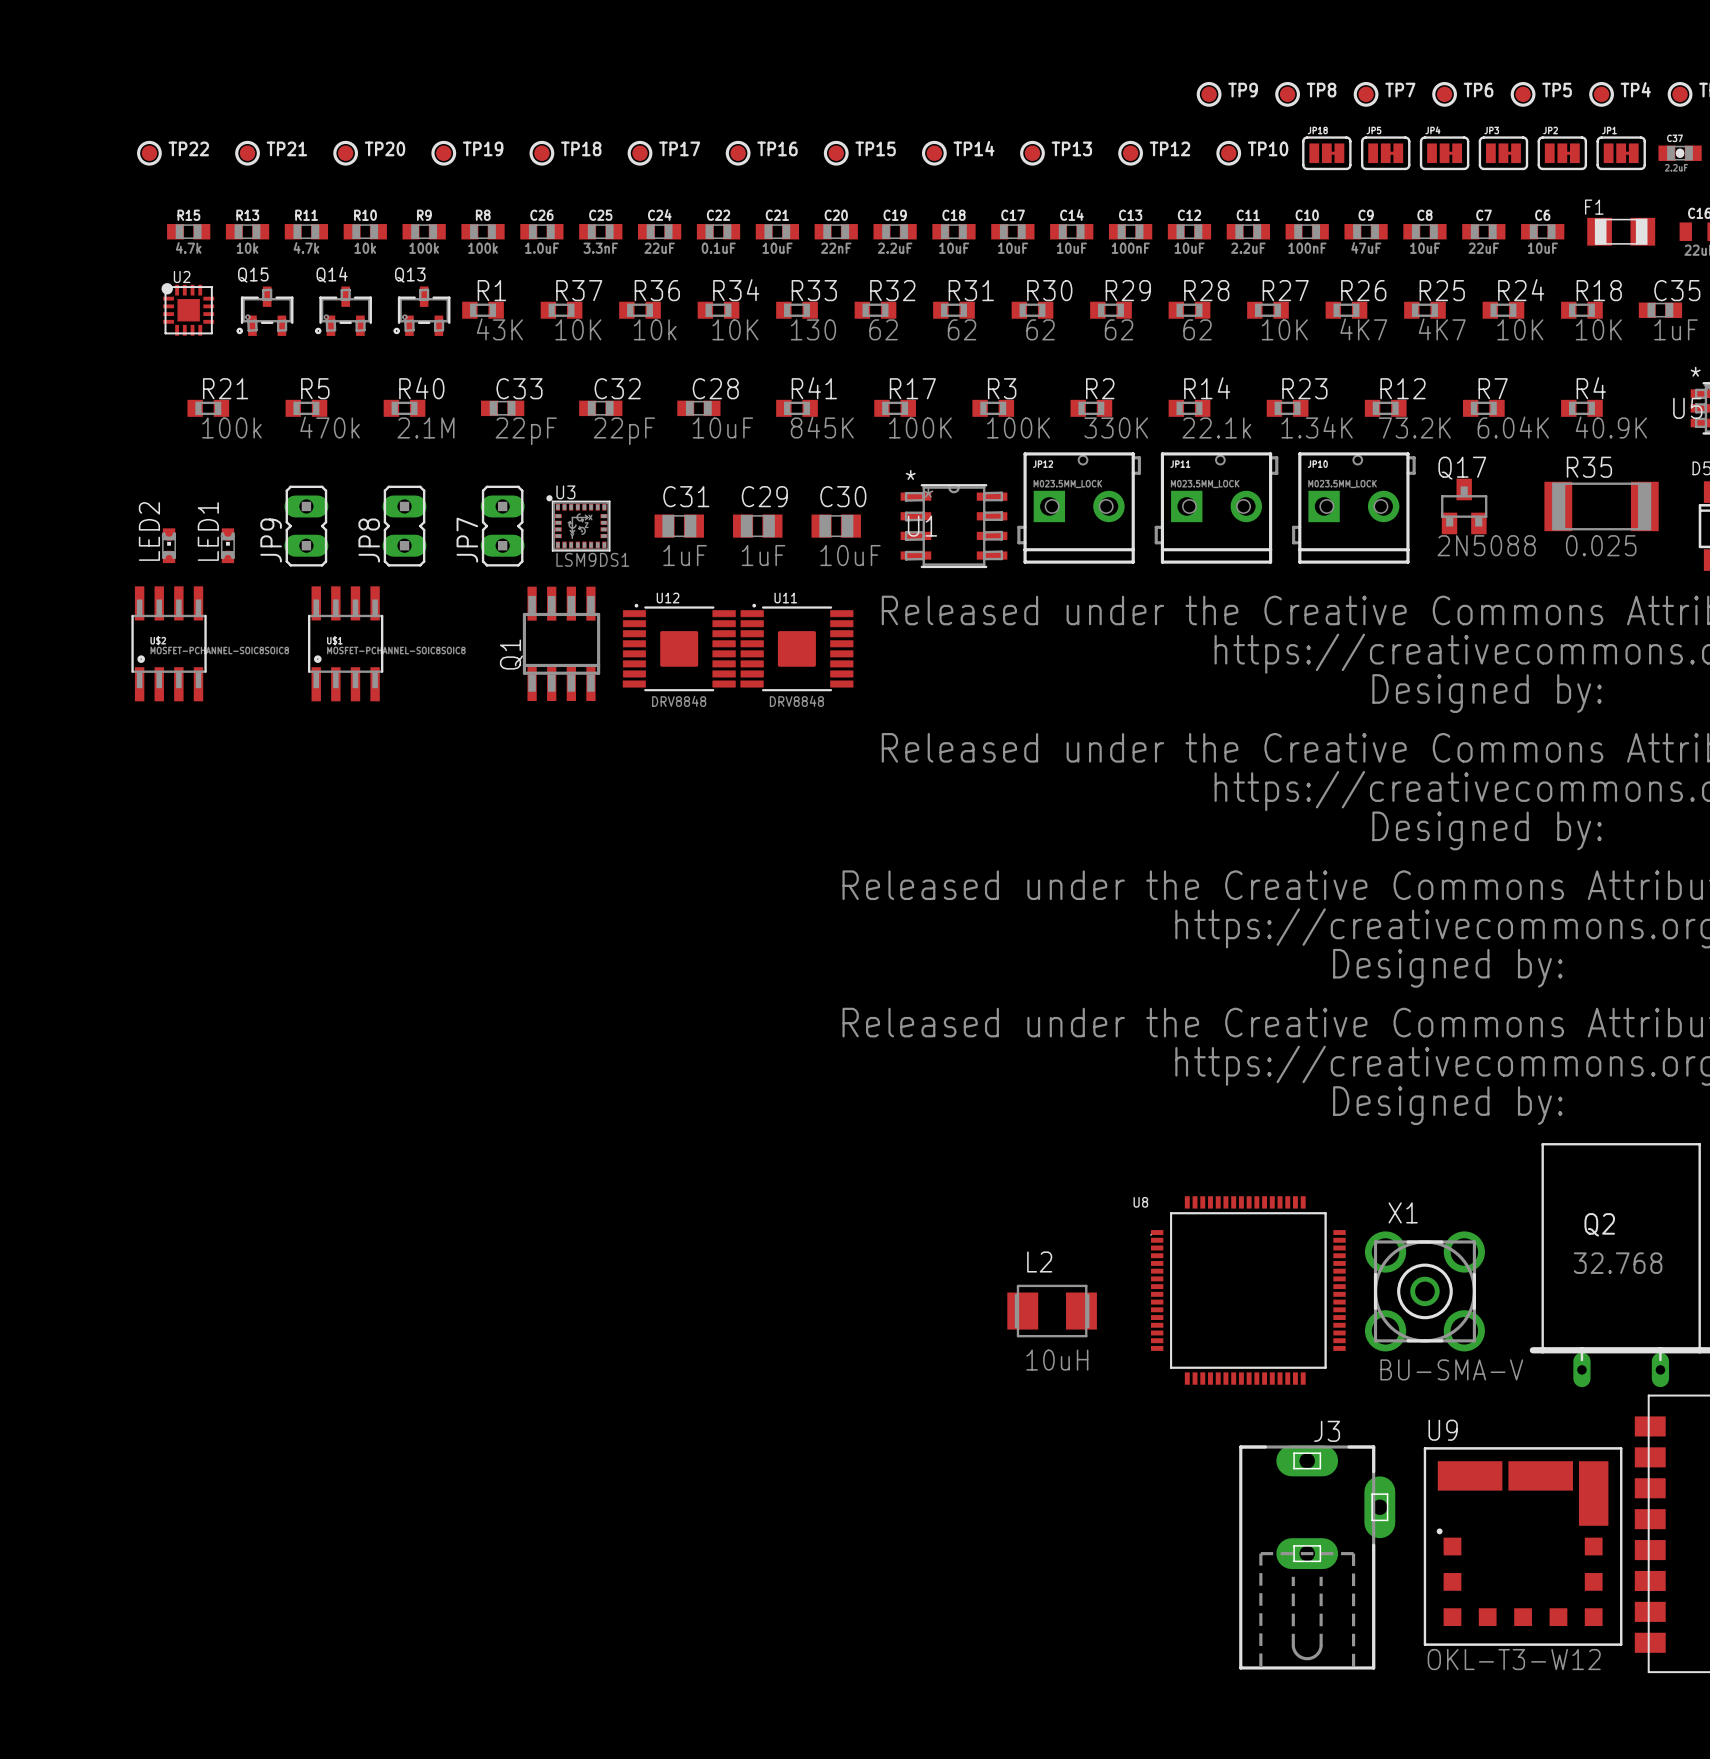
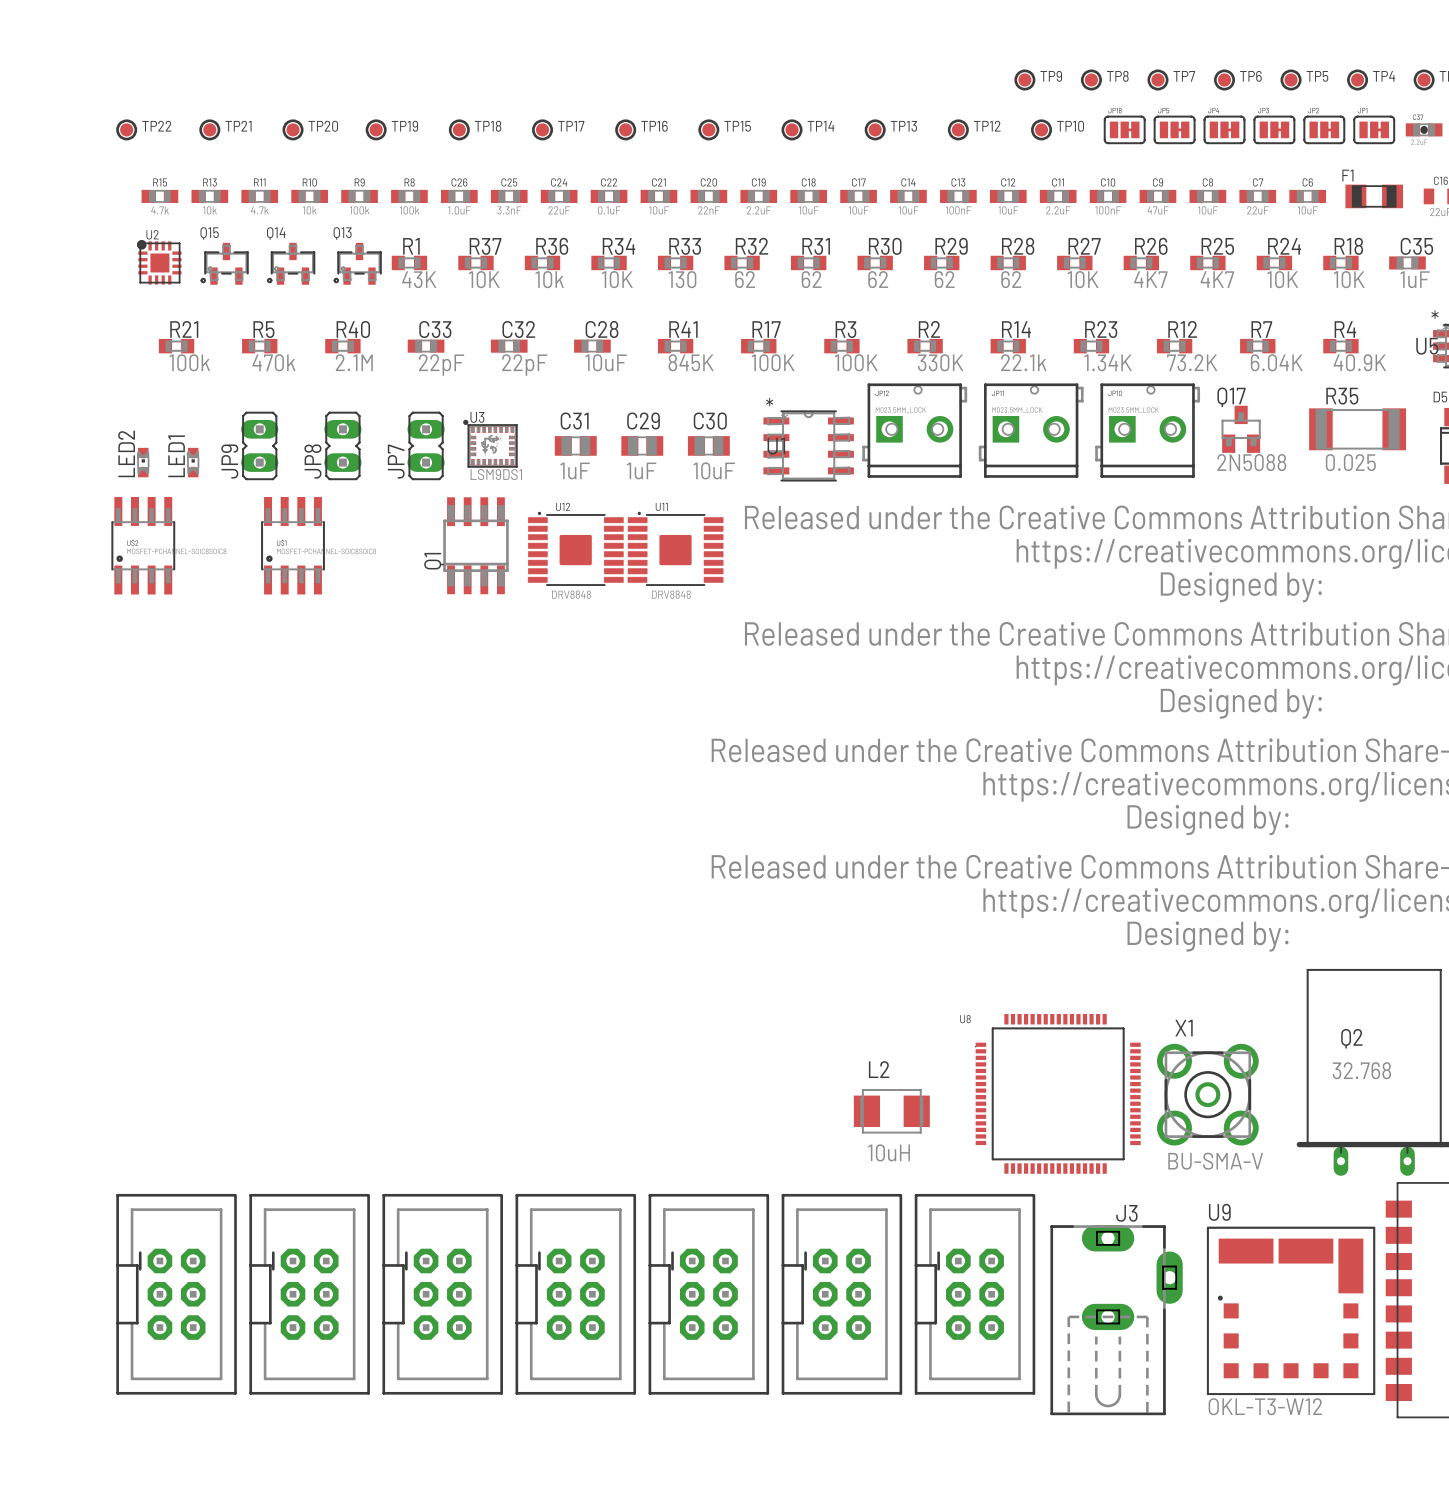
part: none -> (176, 1294)
part: none -> (309, 1294)
part: none -> (442, 1294)
part: none -> (575, 1294)
part: none -> (708, 1294)
part: none -> (841, 1294)
part: none -> (975, 1294)

